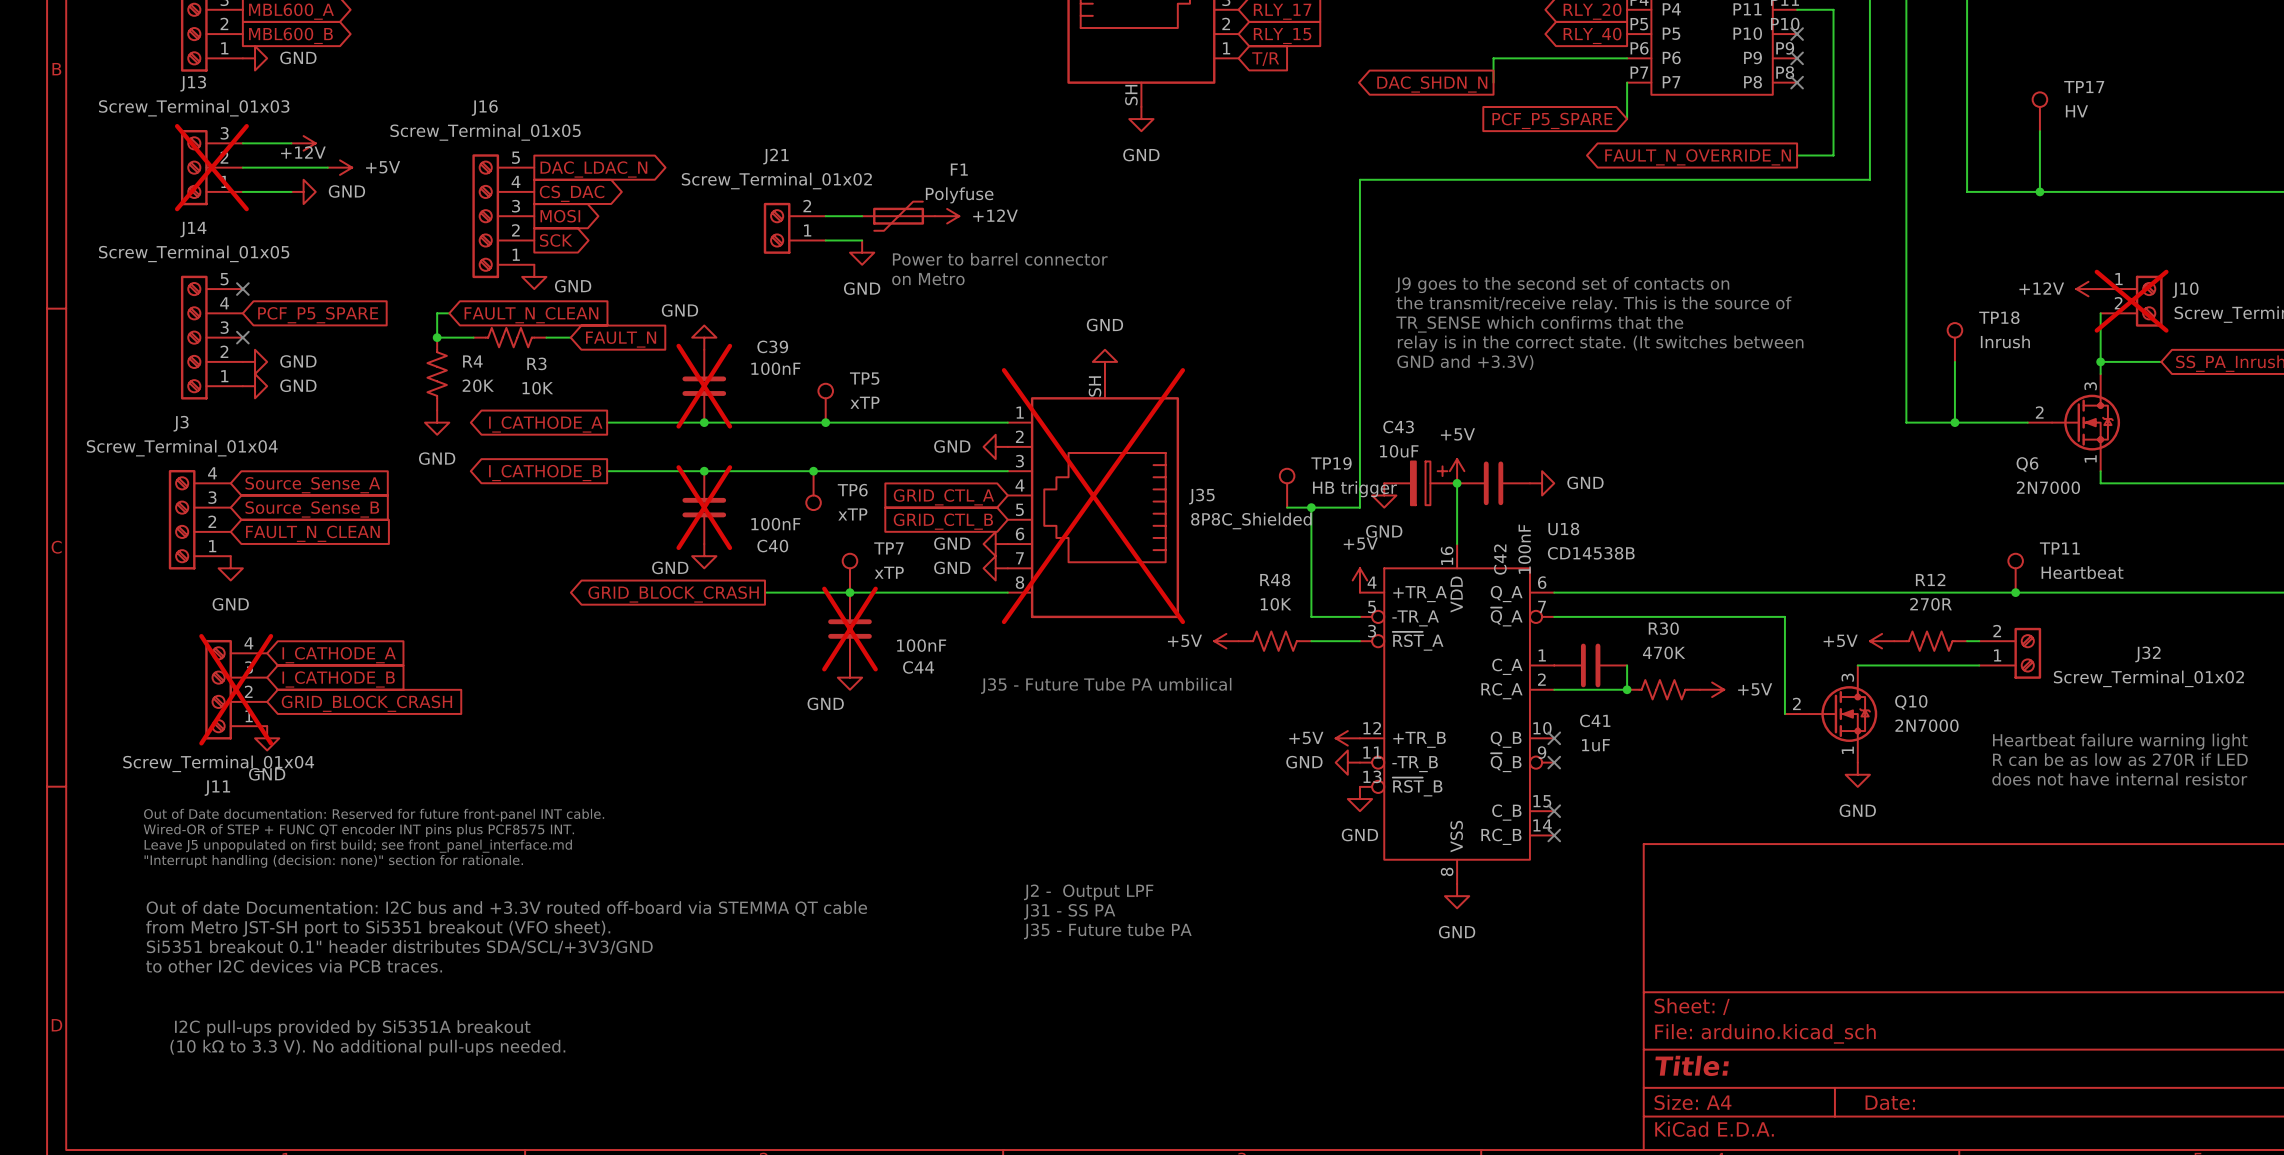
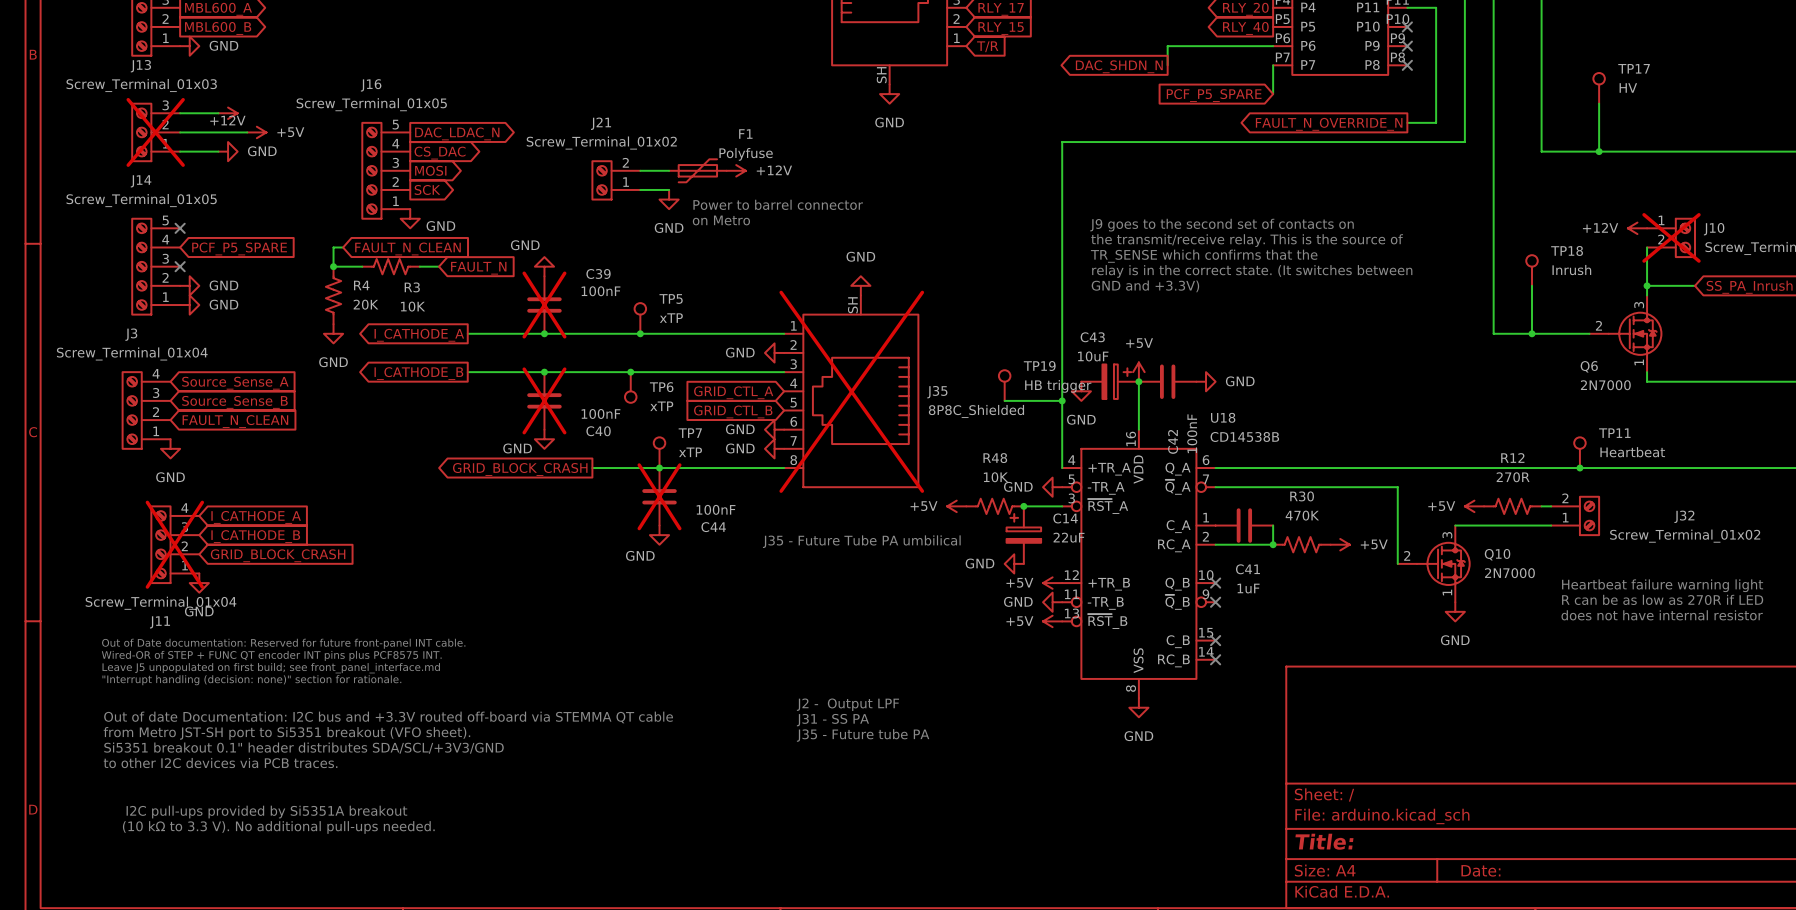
wire: (1311, 507) (1311, 616) (1359, 616) -> none
junction position: (1311, 507) -> (1062, 400)
wire: none -> (1062, 400) (1062, 468)
power symbol rotation: 0° (1359, 580) -> 90° counterclockwise (1052, 621)
power symbol position: +5V (1359, 580) -> +5V (1052, 621)
power symbol: none -> GND (1052, 487)
junction: none -> (1023, 506)
C14: none -> 22uF (1023, 535)
power symbol: none -> GND (1014, 563)
power symbol: GND (1359, 799) -> none

